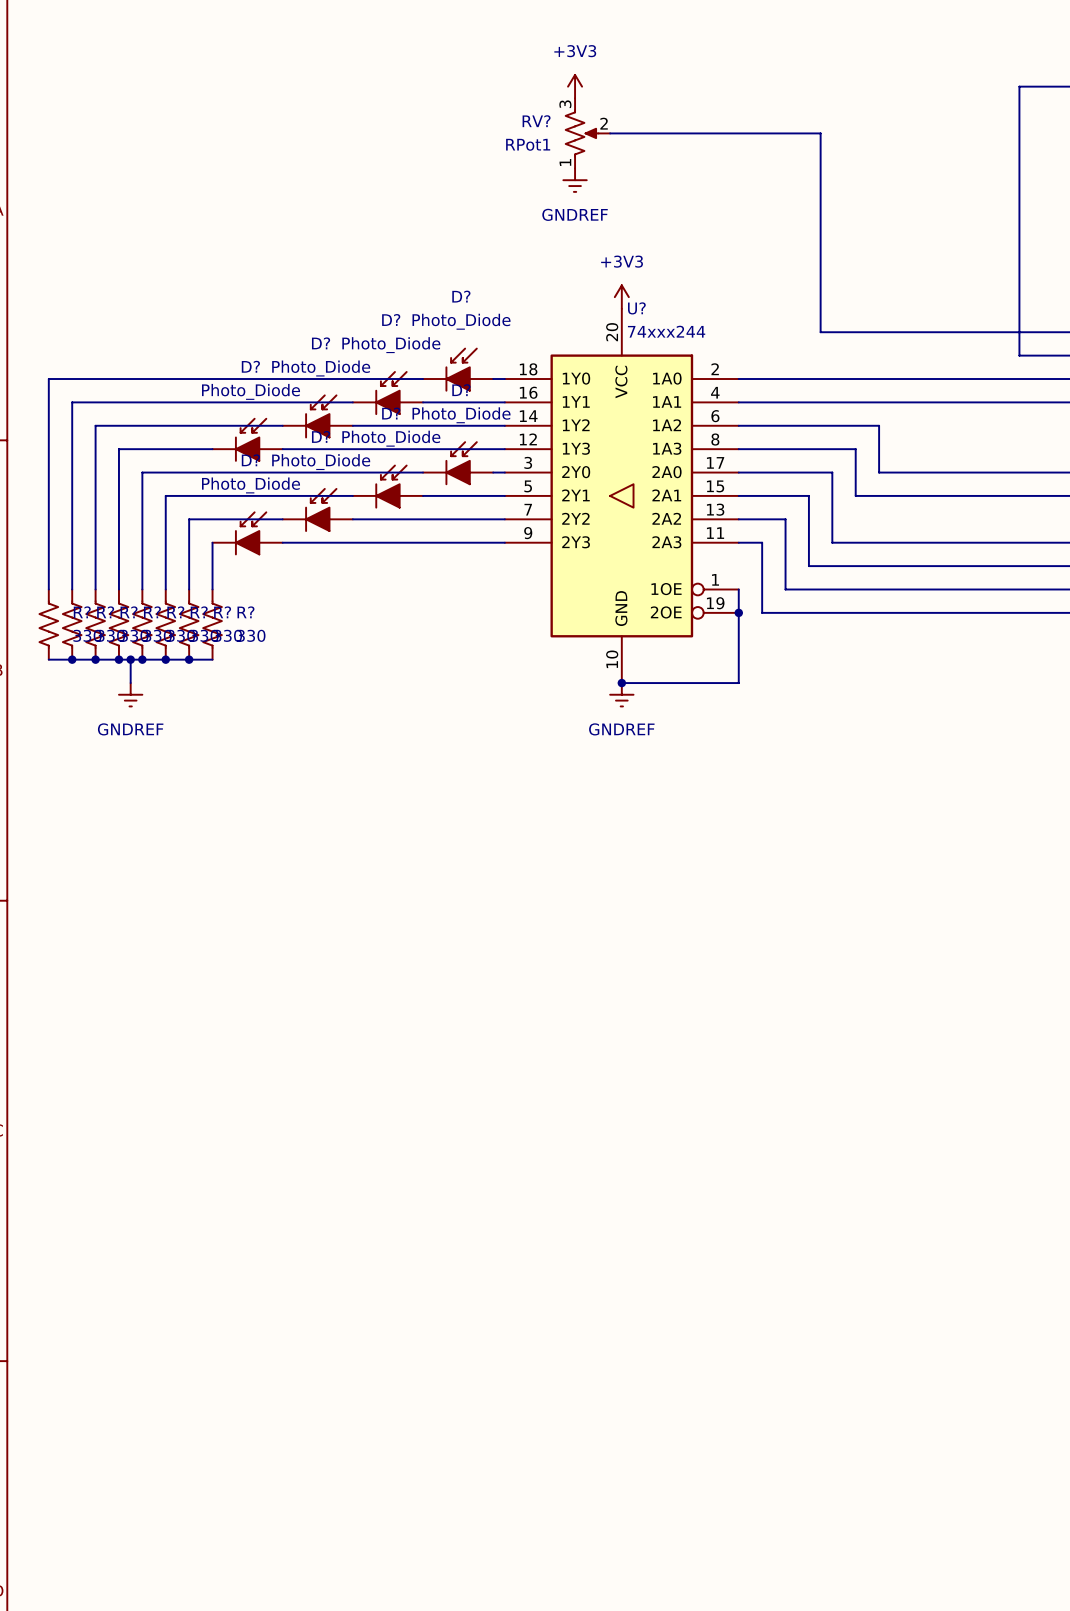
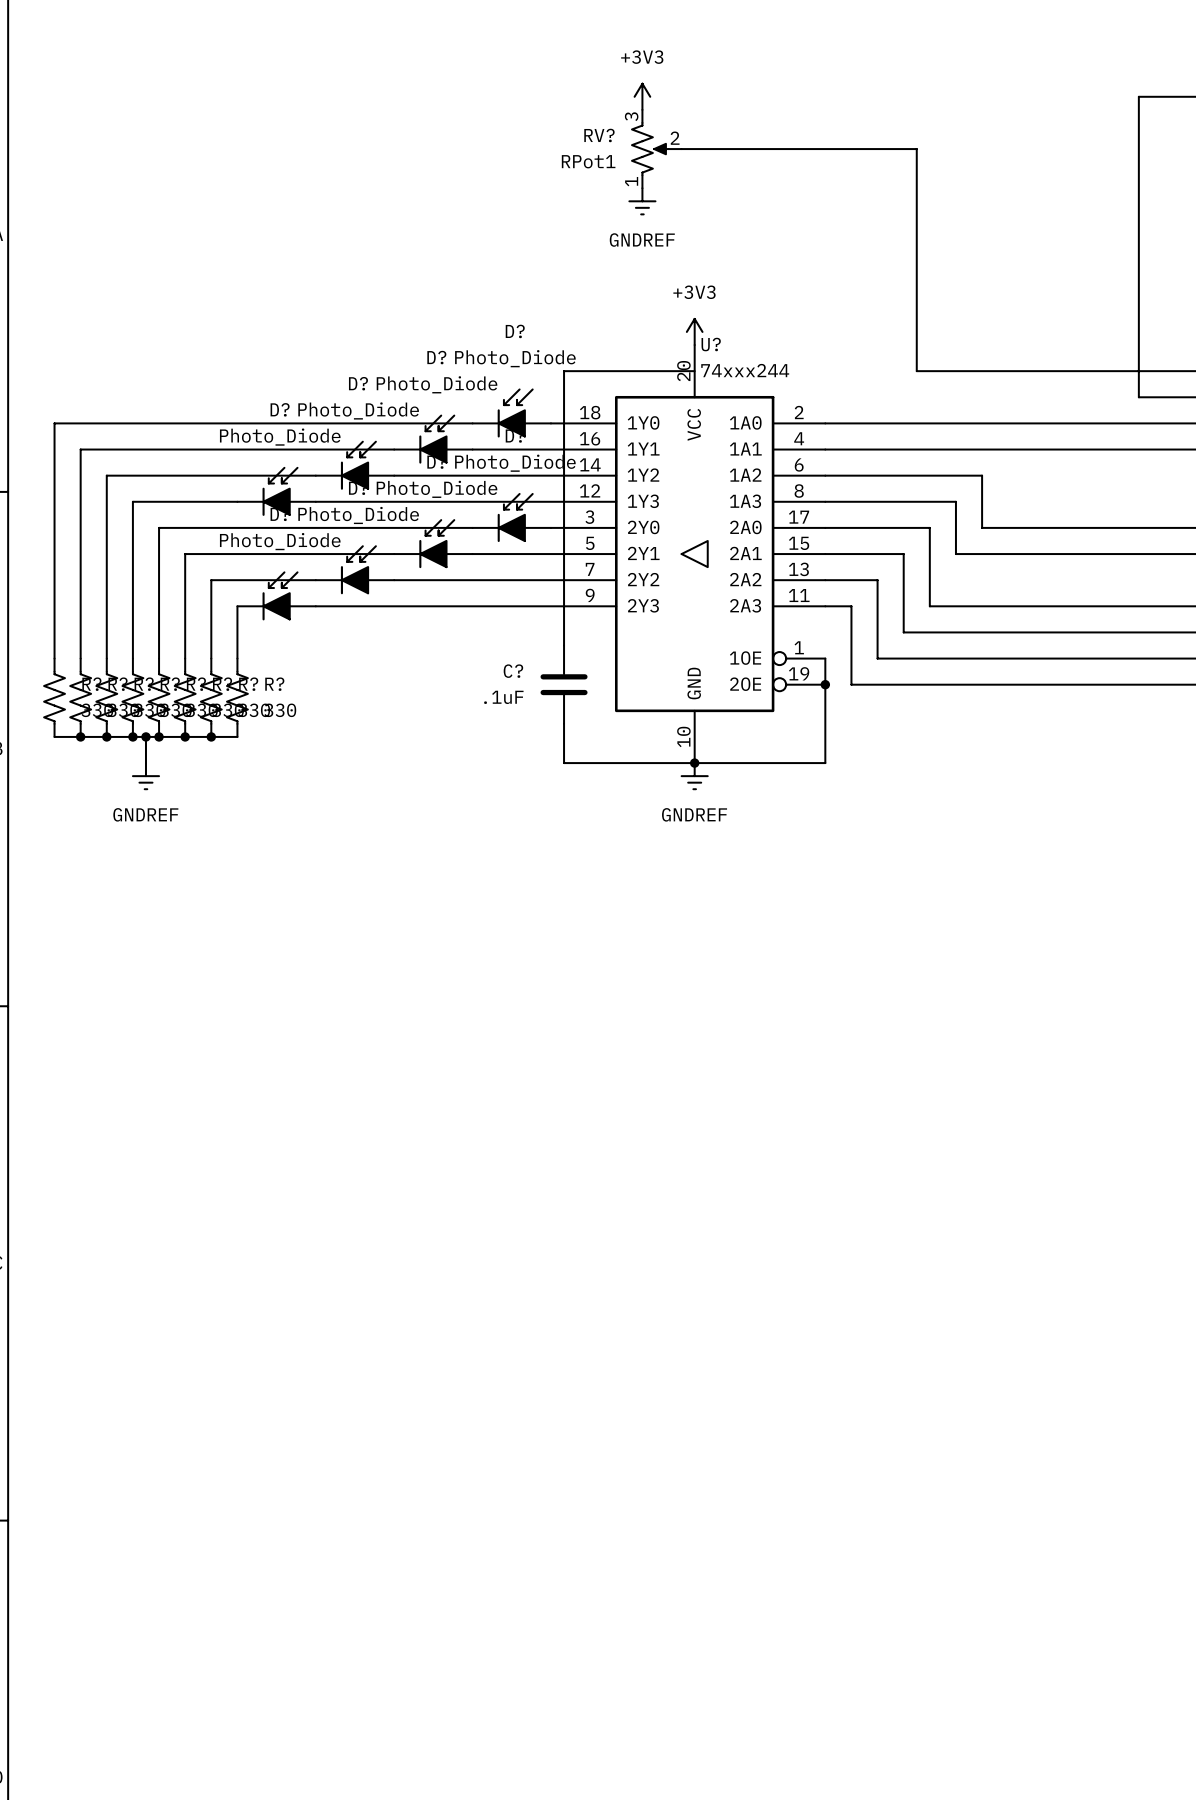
wire: none -> (694, 371) (564, 371) (564, 645)
C?: none -> .1uF (564, 684)
wire: none -> (564, 723) (564, 763) (694, 763)

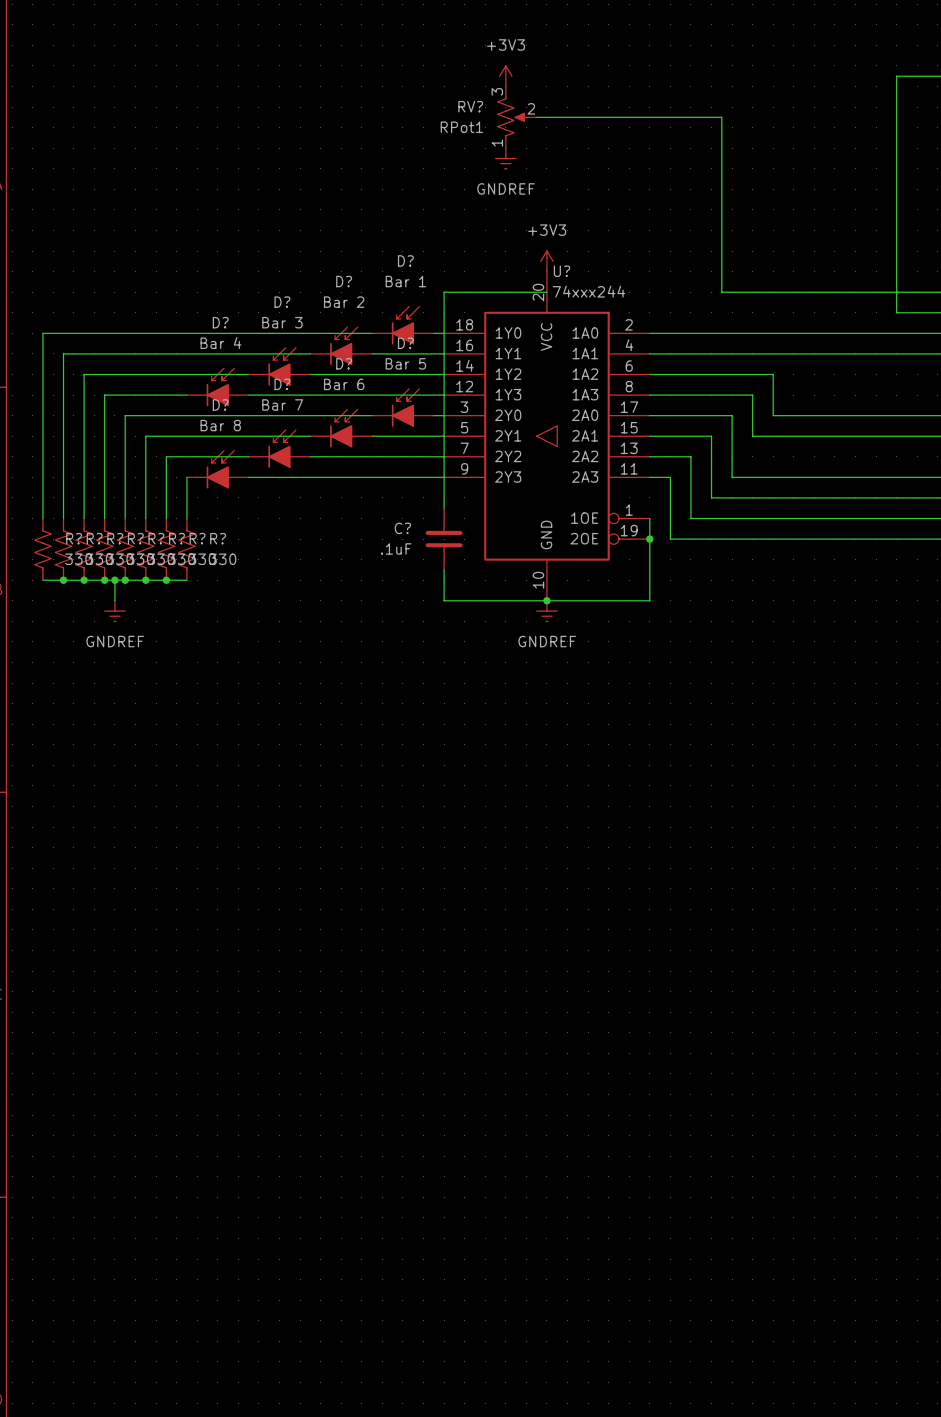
D? value: Photo_Diode (515, 358) -> Bar 1 (405, 281)
D? value: Photo_Diode (437, 384) -> Bar 2 (344, 302)
D? value: Photo_Diode (358, 410) -> Bar 3 (282, 322)
D? value: Photo_Diode (280, 437) -> Bar 4 (220, 343)
D? value: Photo_Diode (515, 463) -> Bar 5 (405, 363)
D? value: Photo_Diode (437, 489) -> Bar 6 (344, 384)
D? value: Photo_Diode (358, 515) -> Bar 7 (282, 404)
D? value: Photo_Diode (280, 541) -> Bar 8 (220, 425)

